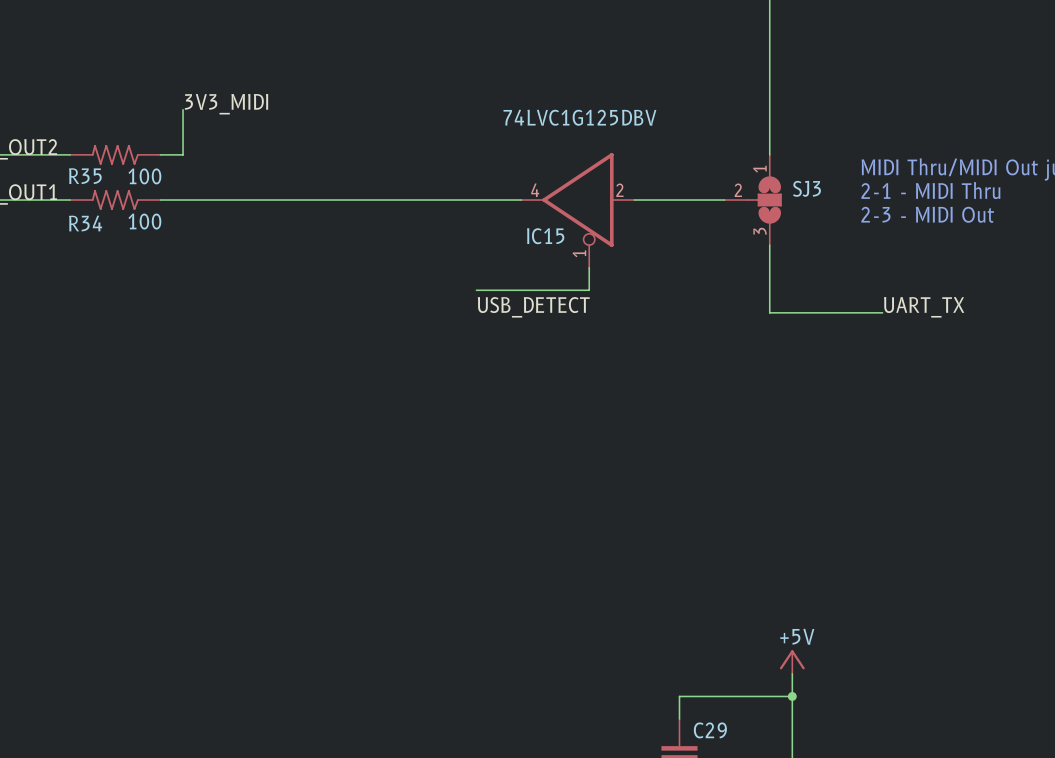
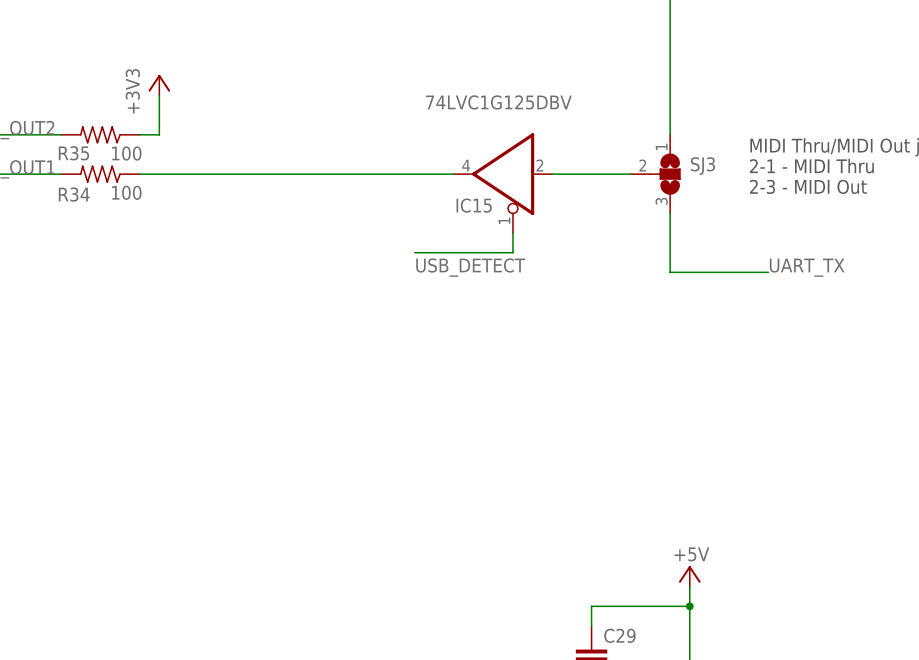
power symbol: none -> +3V3 (159, 85)
label: 3V3_MIDI (226, 104) -> none

